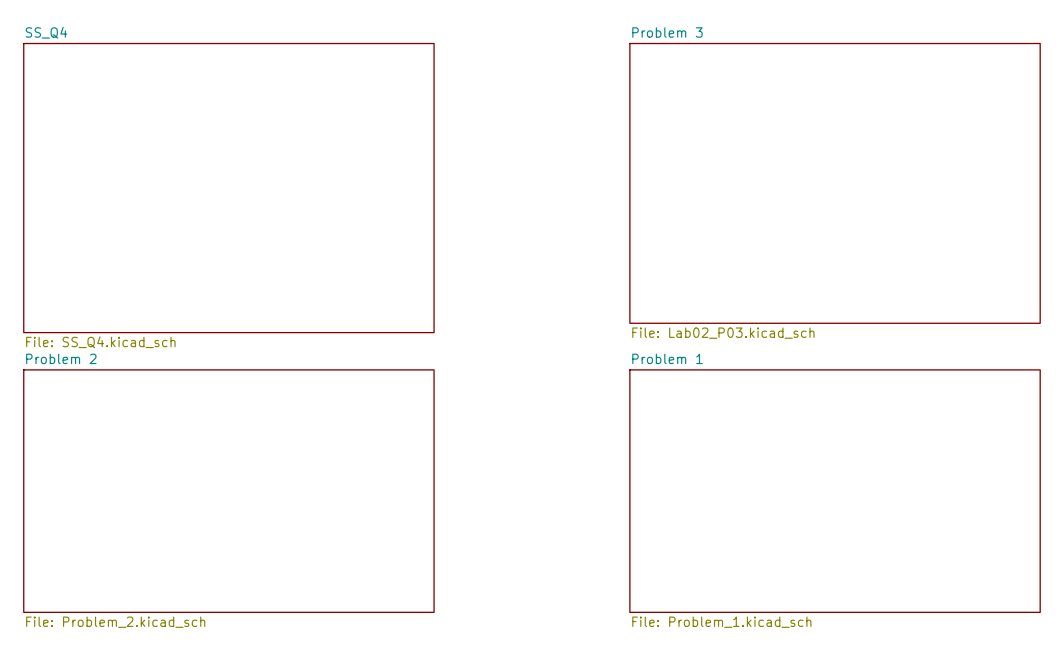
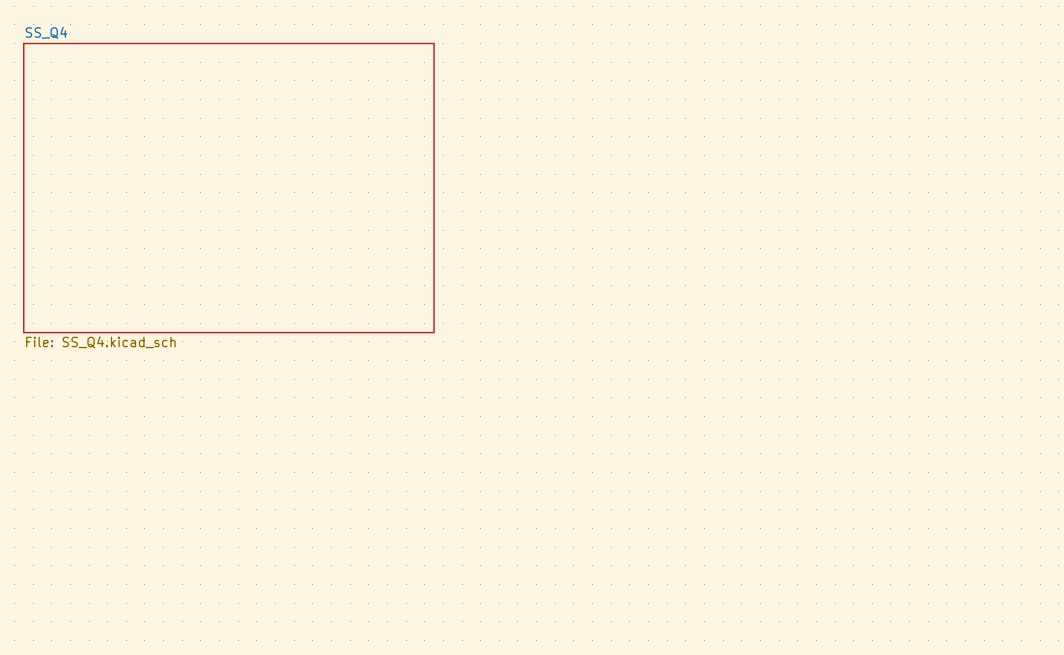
sheet Problem 3: File: Lab02_P03.kicad_sch (835, 183) -> none
sheet Problem 2: File: Problem_2.kicad_sch (228, 491) -> none
sheet Problem 1: File: Problem_1.kicad_sch (835, 491) -> none

